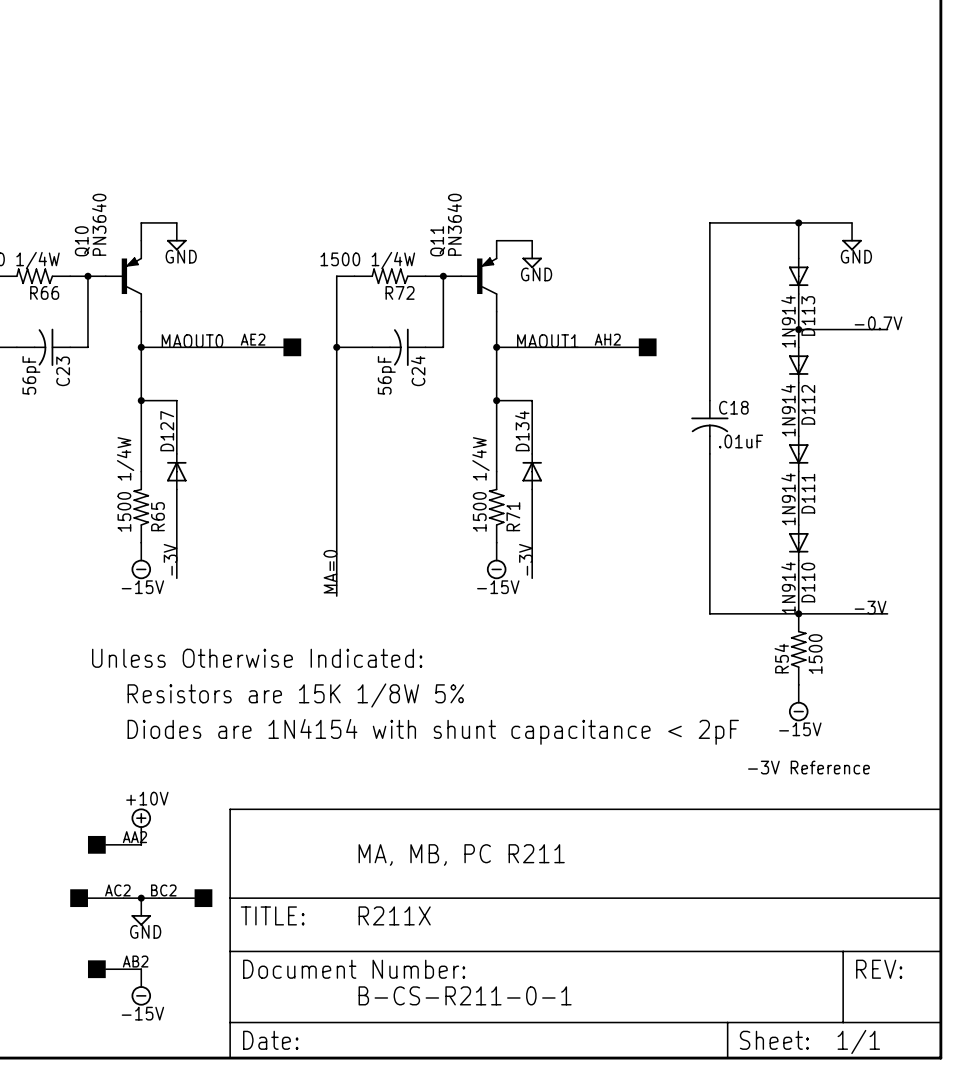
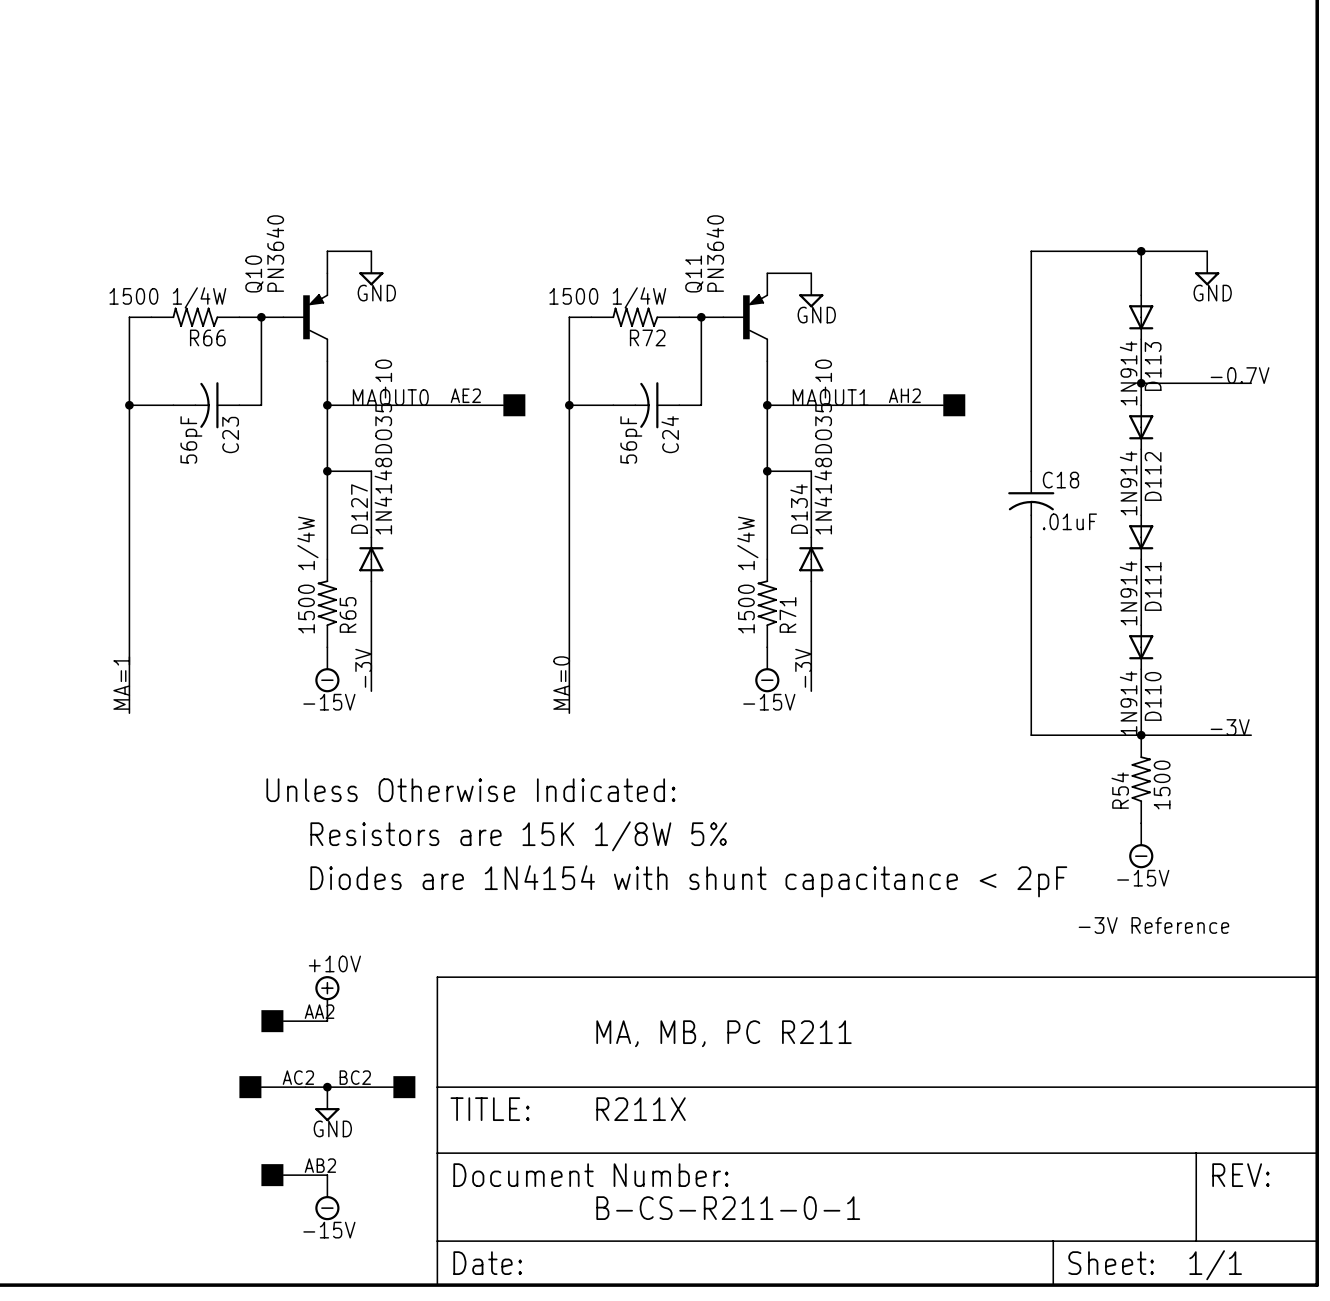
D127 value: none -> 1N4148DO35-10 (383, 447)
D134 value: none -> 1N4148DO35-10 (823, 447)

